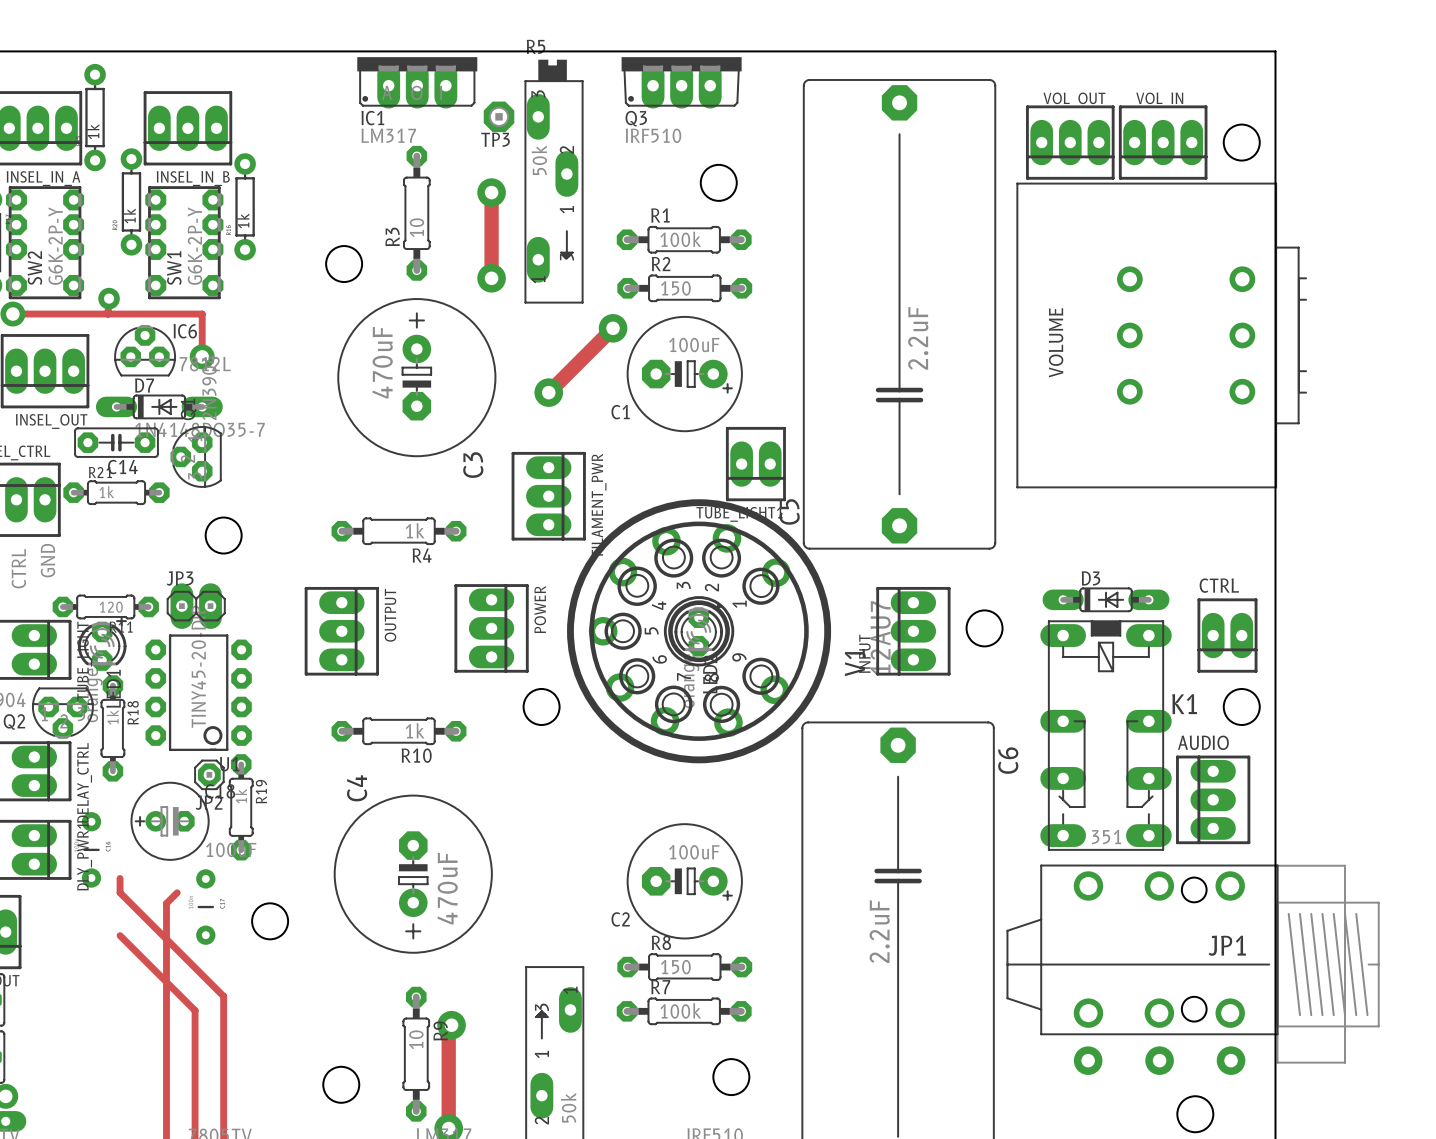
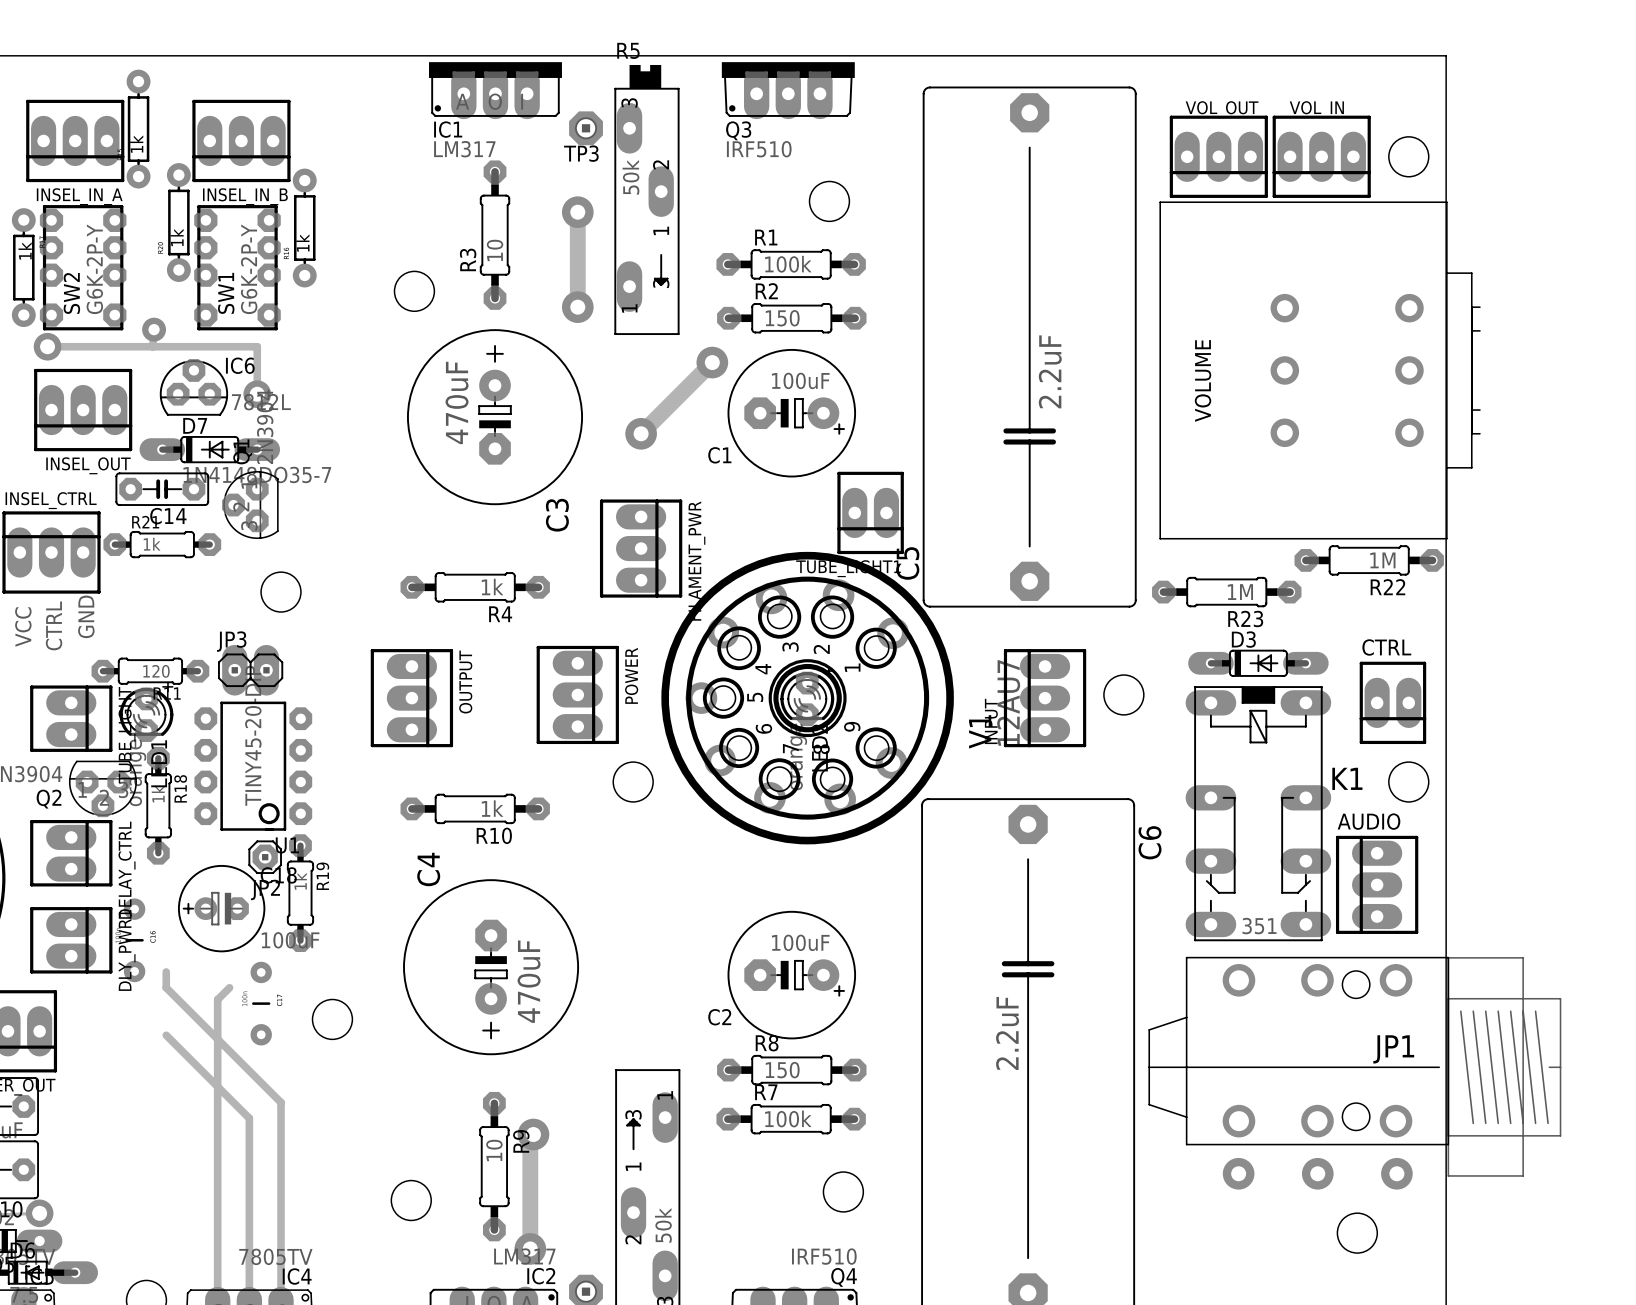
R22: none -> 1M (1369, 560)
R23: none -> 1M (1226, 592)

